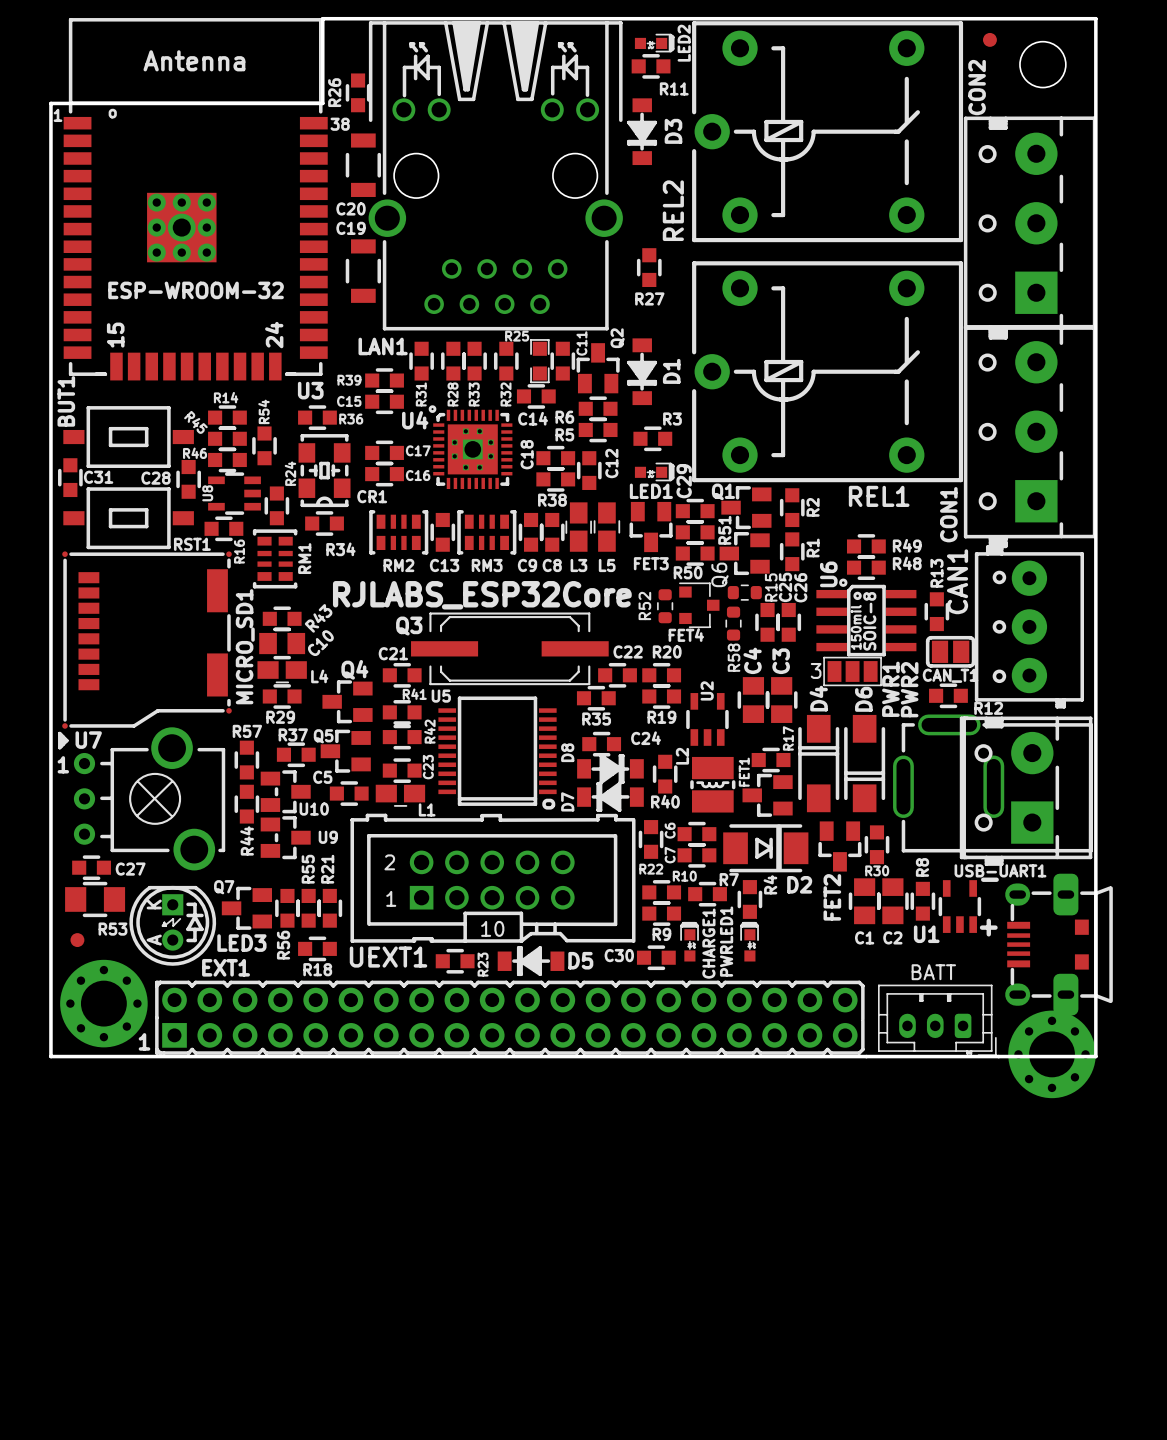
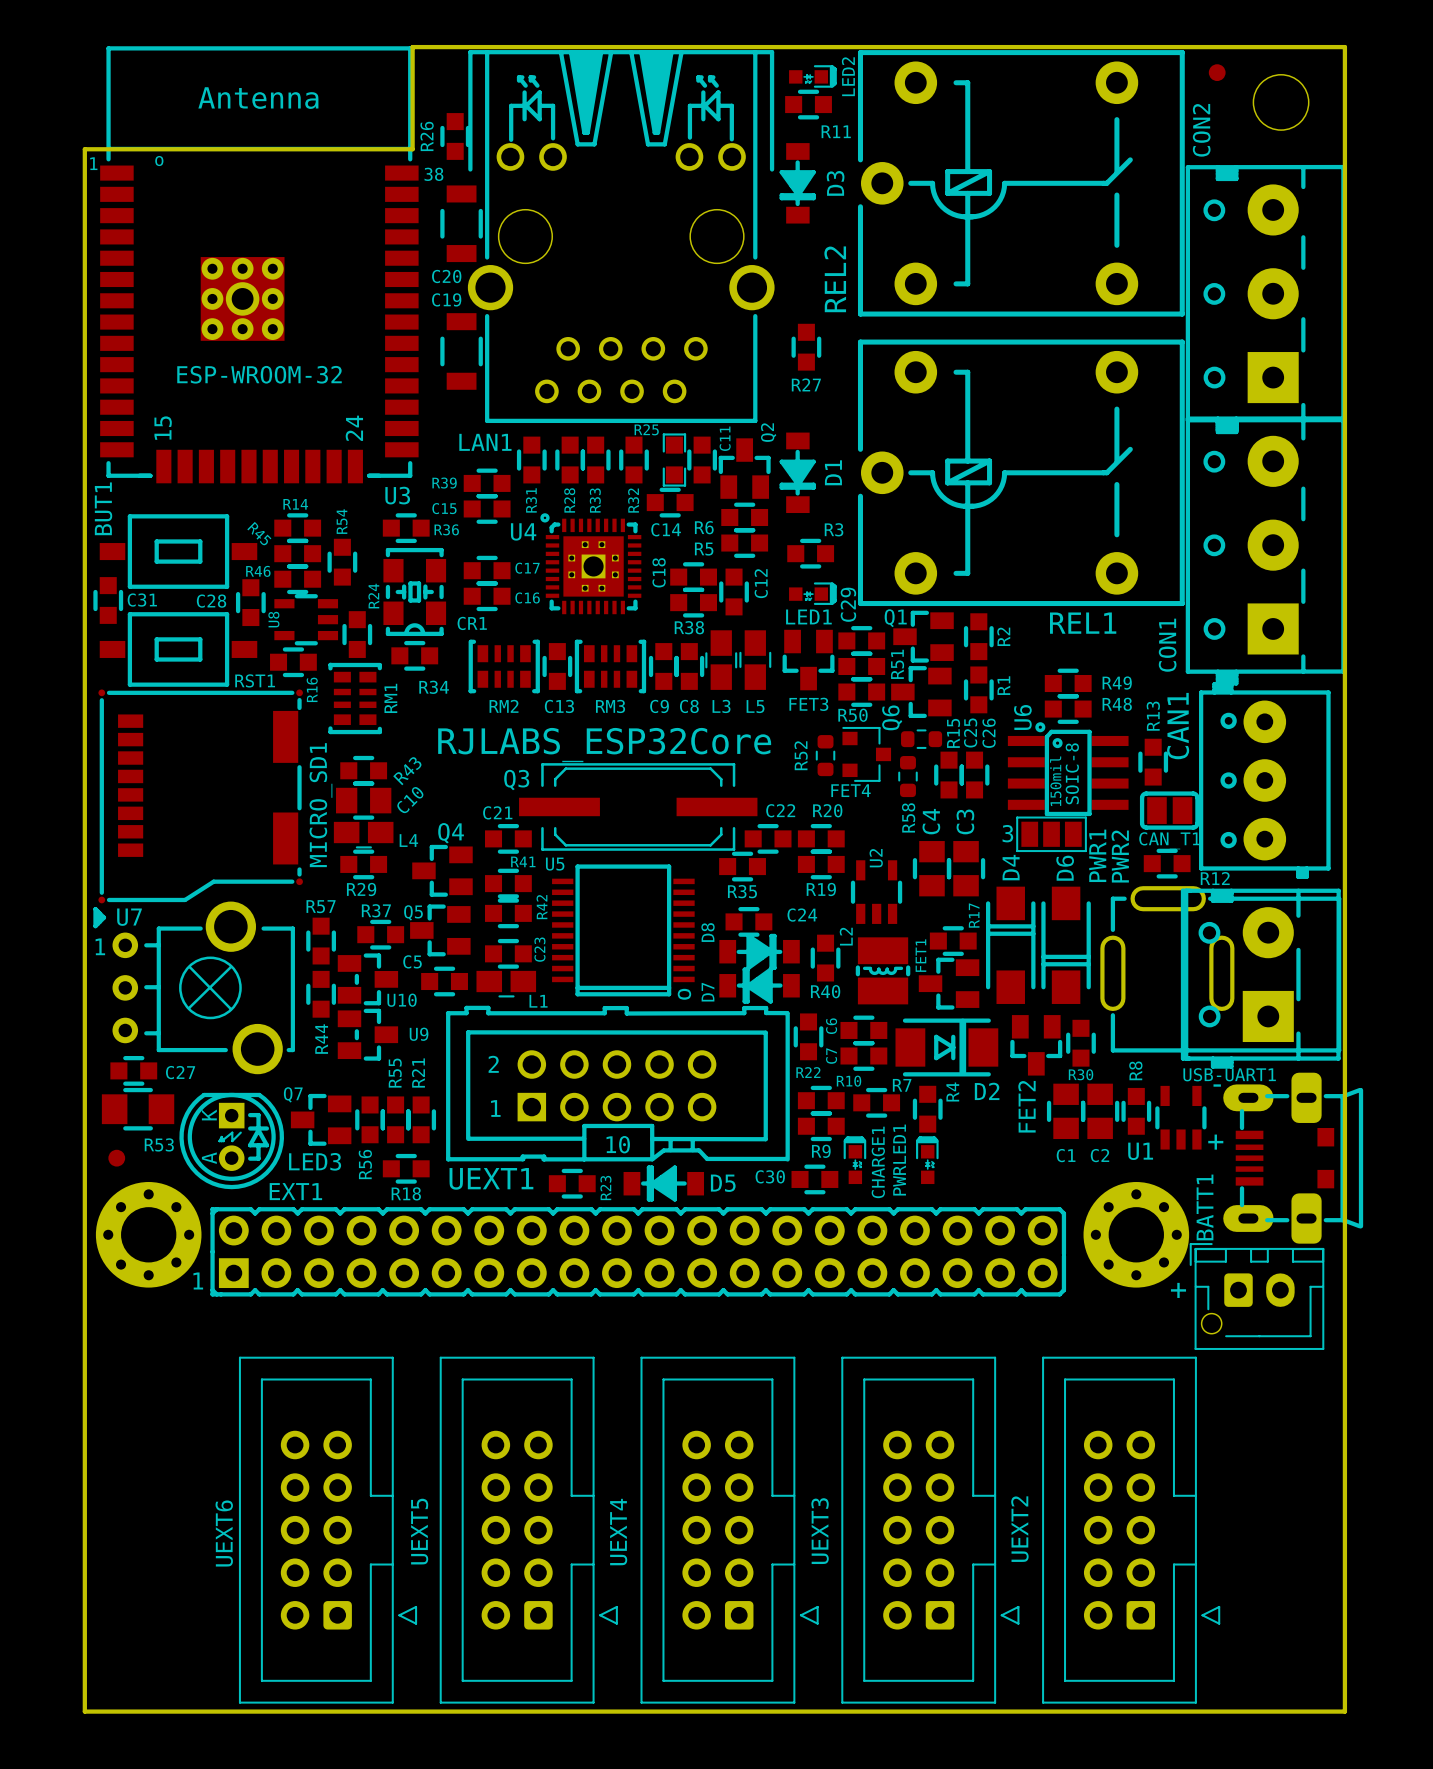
USB-UART1 footprint: [1005, 873, 1113, 1016] -> [1223, 1072, 1364, 1244]
BATT: (937, 1020) -> none
text: none -> + (1178, 1290)
BATT1: none -> (1257, 1296)
part position: (1052, 1054) -> (1136, 1234)
board edge: (50, 1056) (1095, 1056) -> (84, 1298) (84, 1711) (1344, 1711) (1344, 1298)
UEXT6: none -> (328, 1530)
UEXT5: none -> (528, 1530)
UEXT4: none -> (729, 1530)
UEXT3: none -> (930, 1530)
UEXT2: none -> (1131, 1530)

